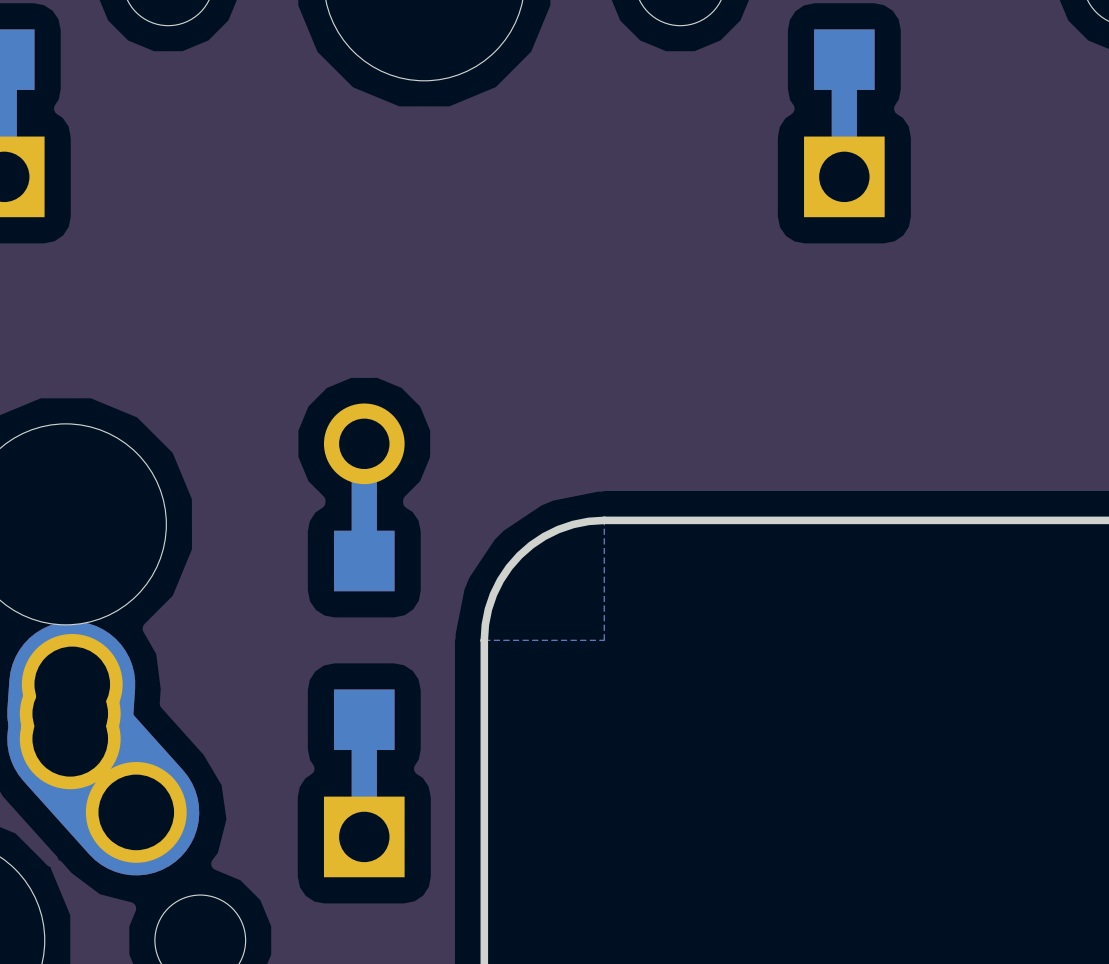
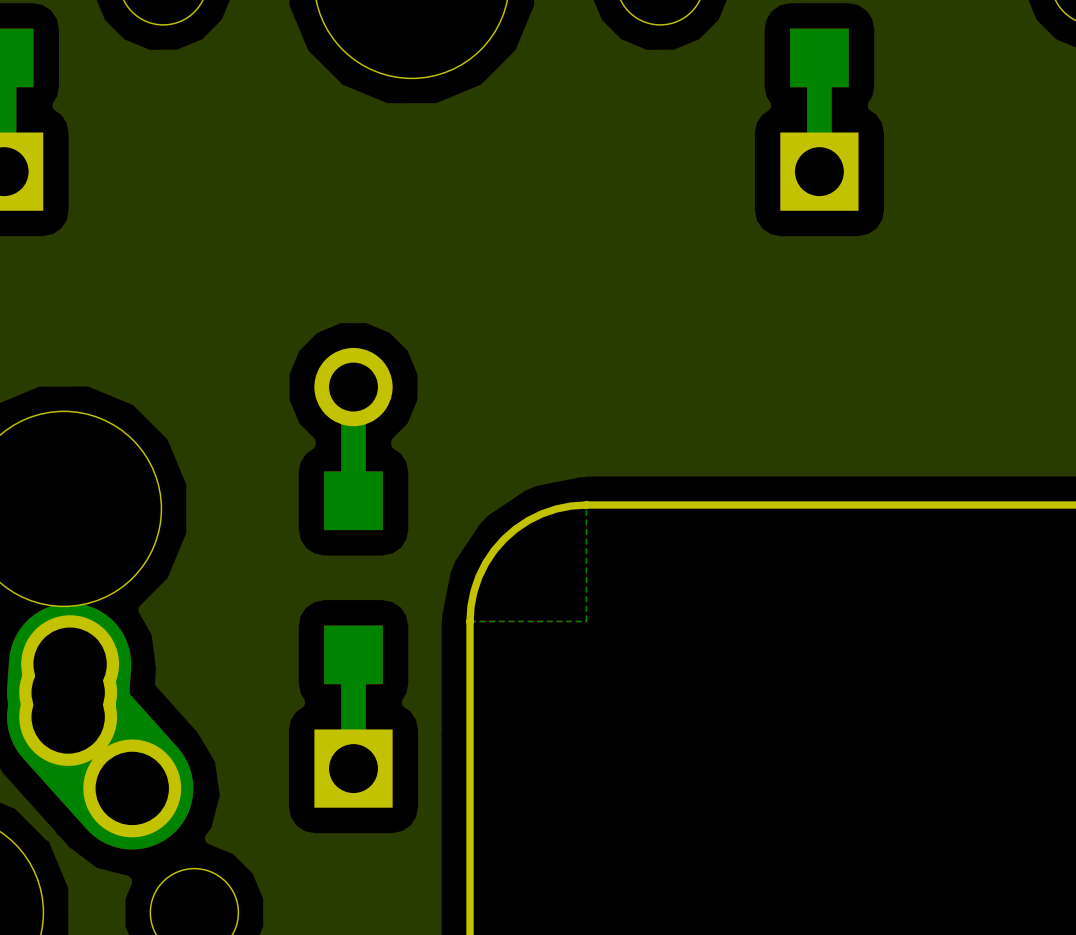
part position: (364, 640) -> (353, 577)

